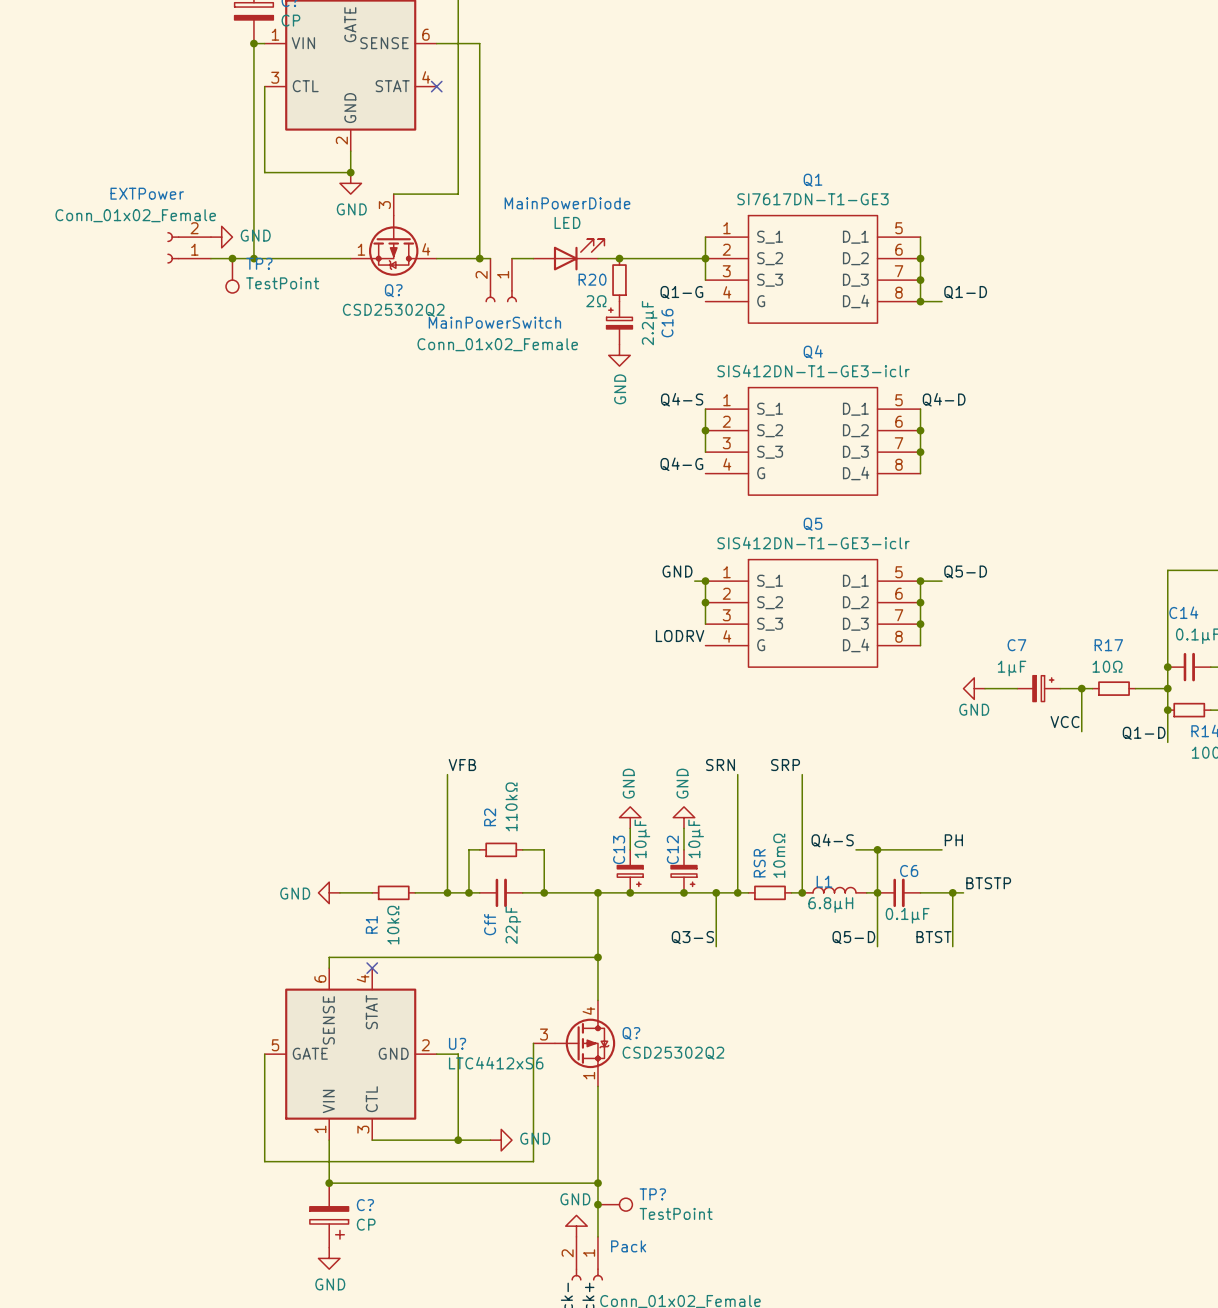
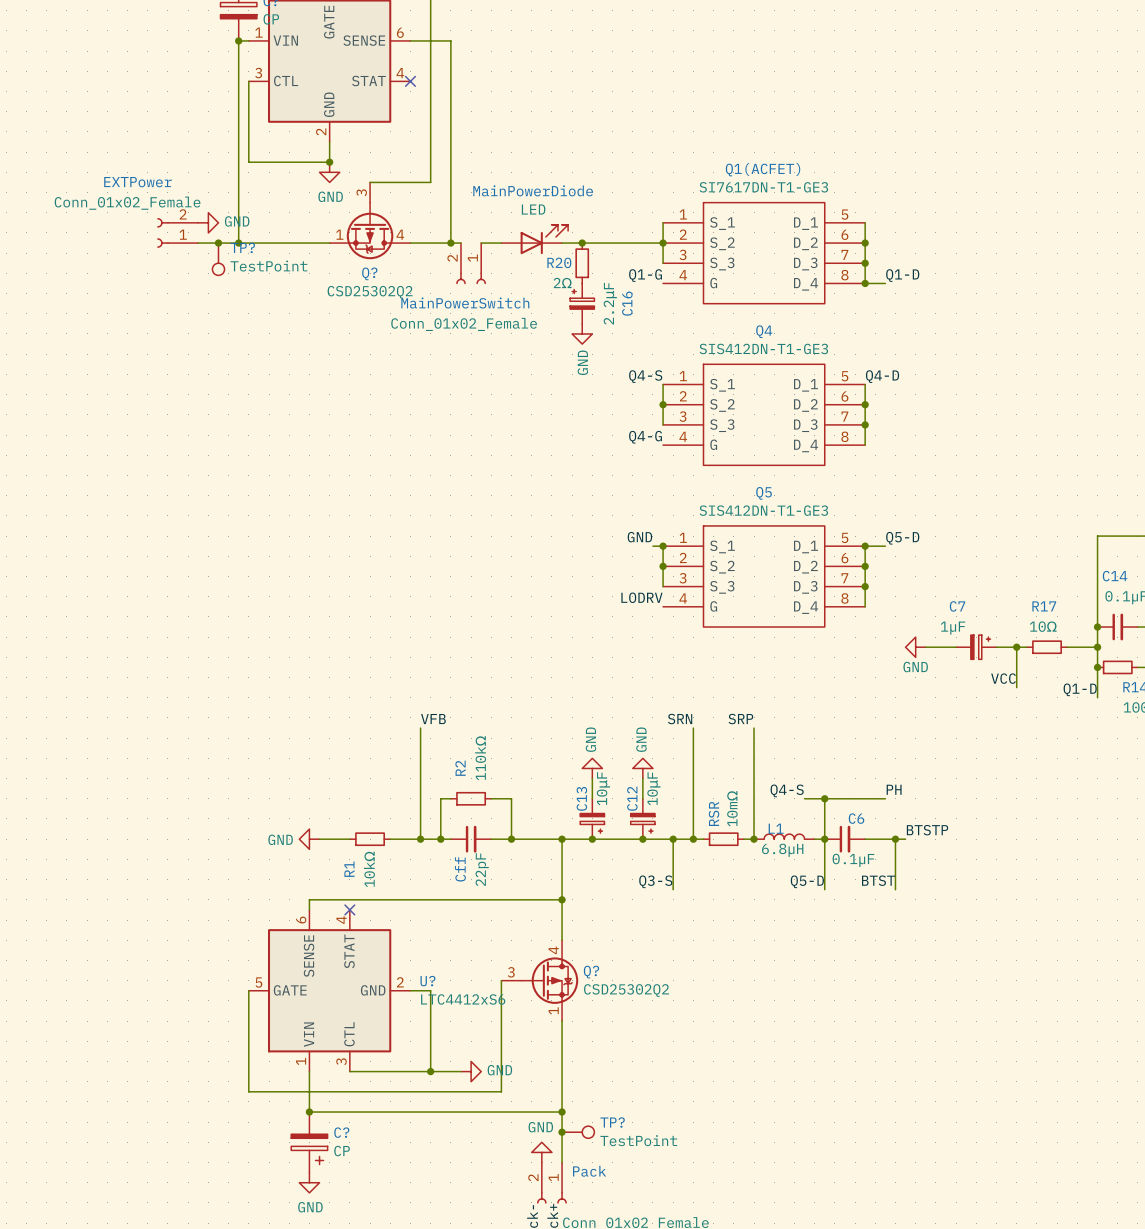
Q1 name: Q1 (813, 180) -> Q1(ACFET) (763, 169)
Q4 value: SIS412DN-T1-GE3-iclr (813, 371) -> SIS412DN-T1-GE3 (763, 348)
Q5 value: SIS412DN-T1-GE3-iclr (813, 543) -> SIS412DN-T1-GE3 (763, 510)

